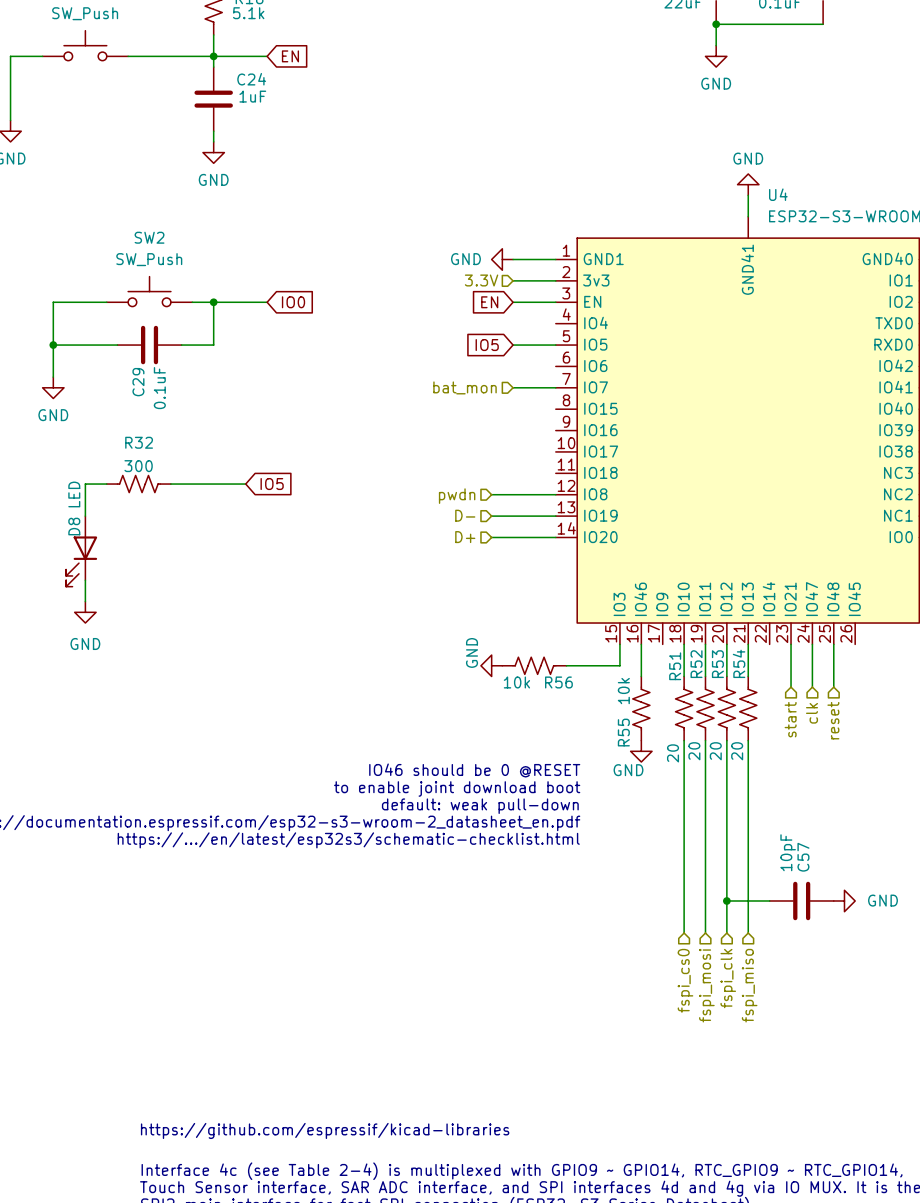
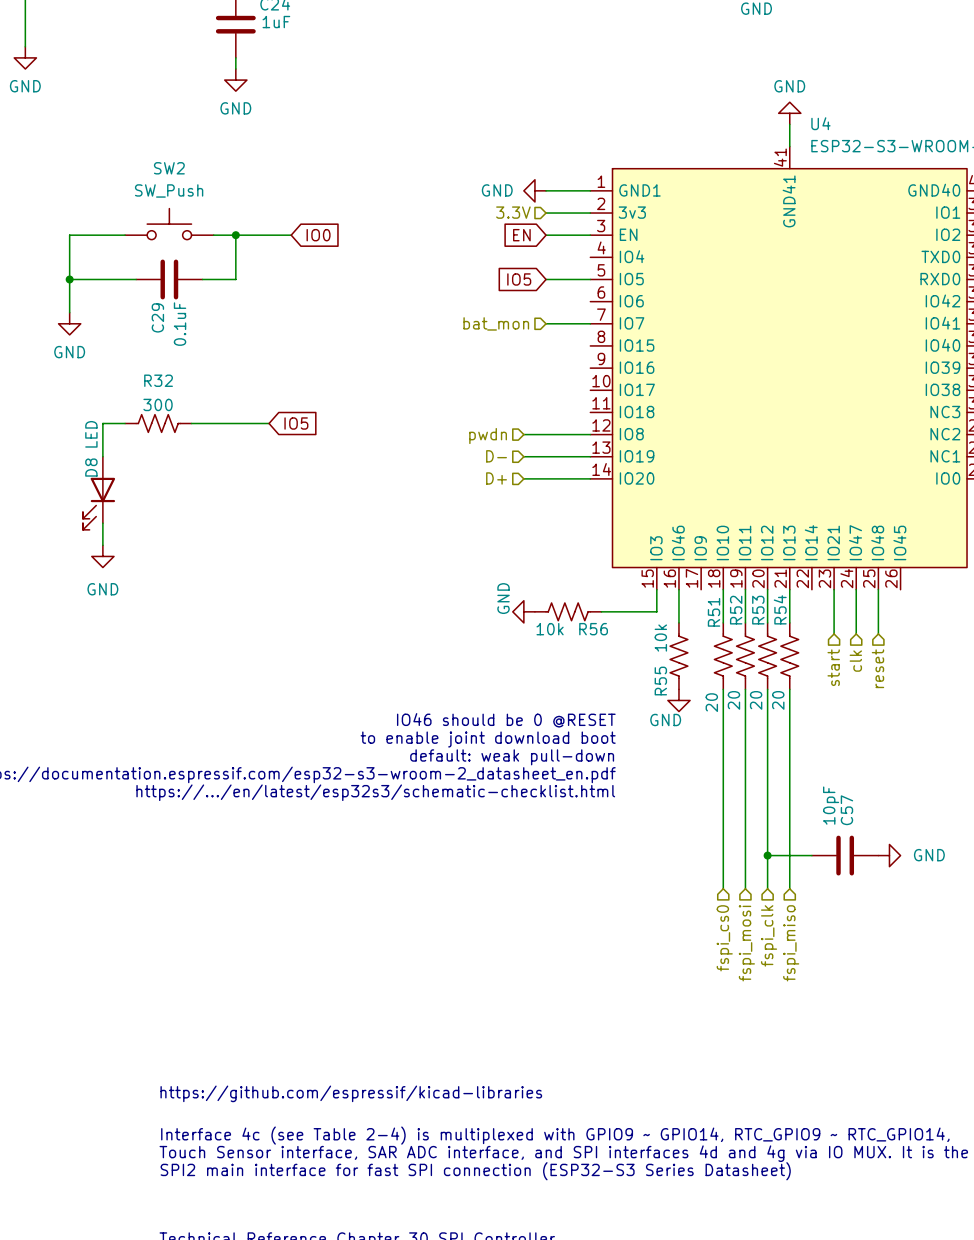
U4 pin number: none -> 41 (780, 157)

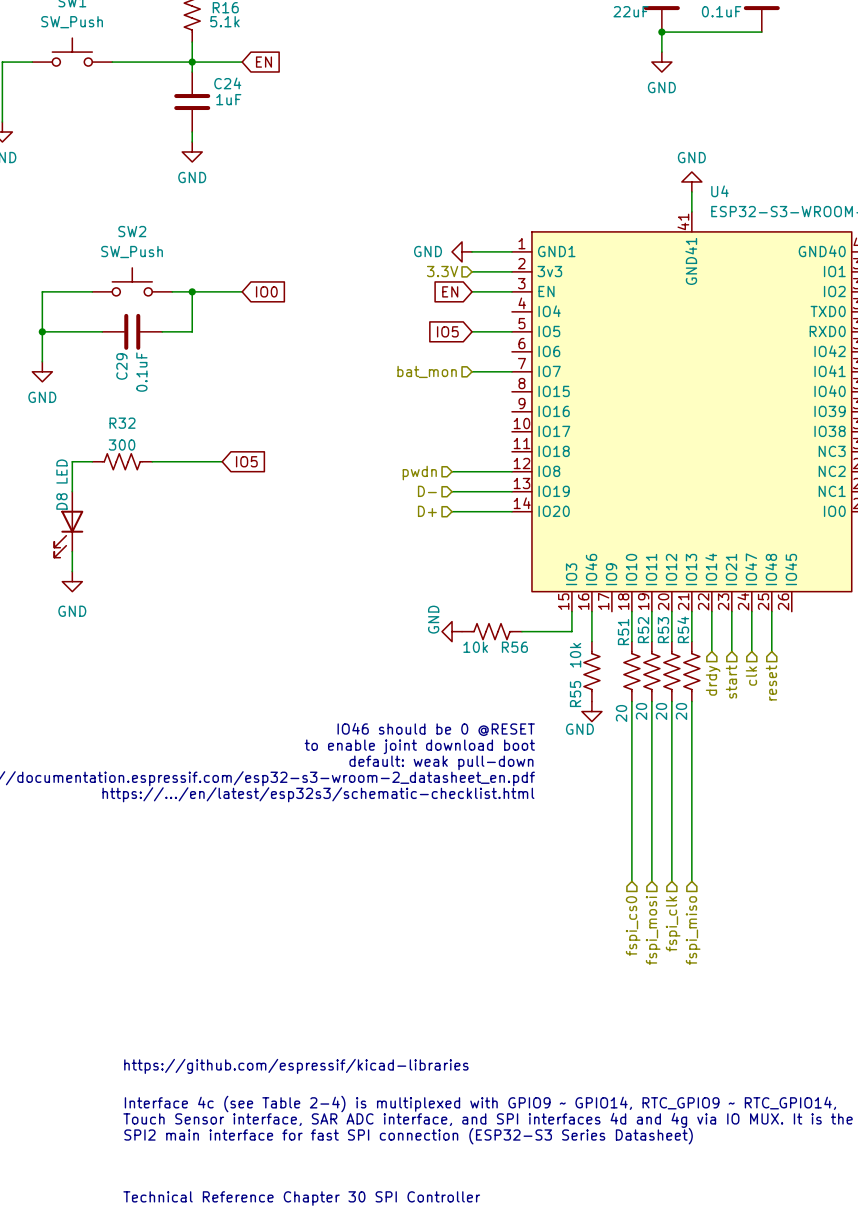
wire: none -> (711, 611) (711, 651)
hierarchical label: none -> drdy (713, 680)
wire: (767, 855) (811, 855) -> none
junction: (767, 855) -> none
C57: 10pF (845, 855) -> none
power symbol: GND (889, 855) -> none

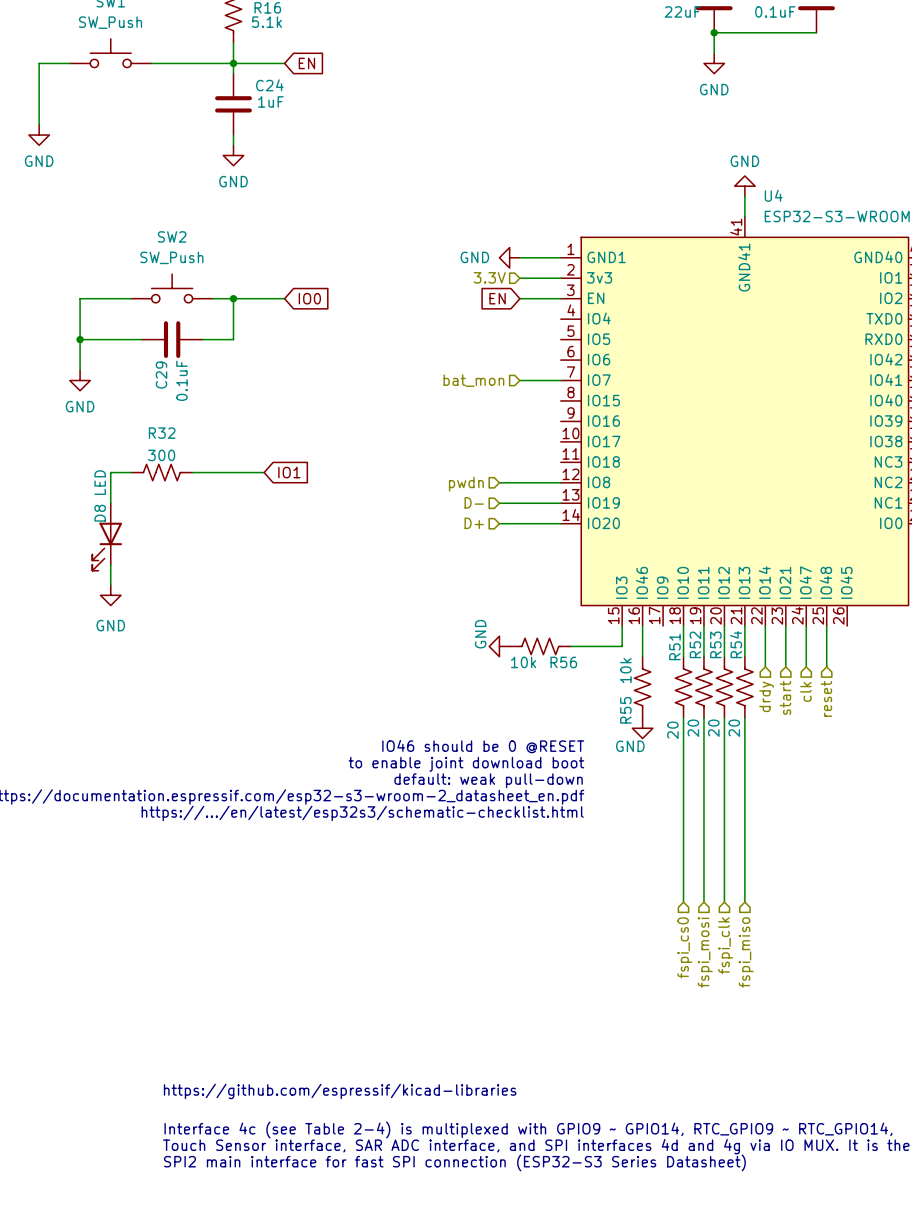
global label: IO5 (447, 331) -> none
wire: (472, 331) (511, 331) -> none
global label: IO5 (246, 461) -> IO1 (289, 472)

